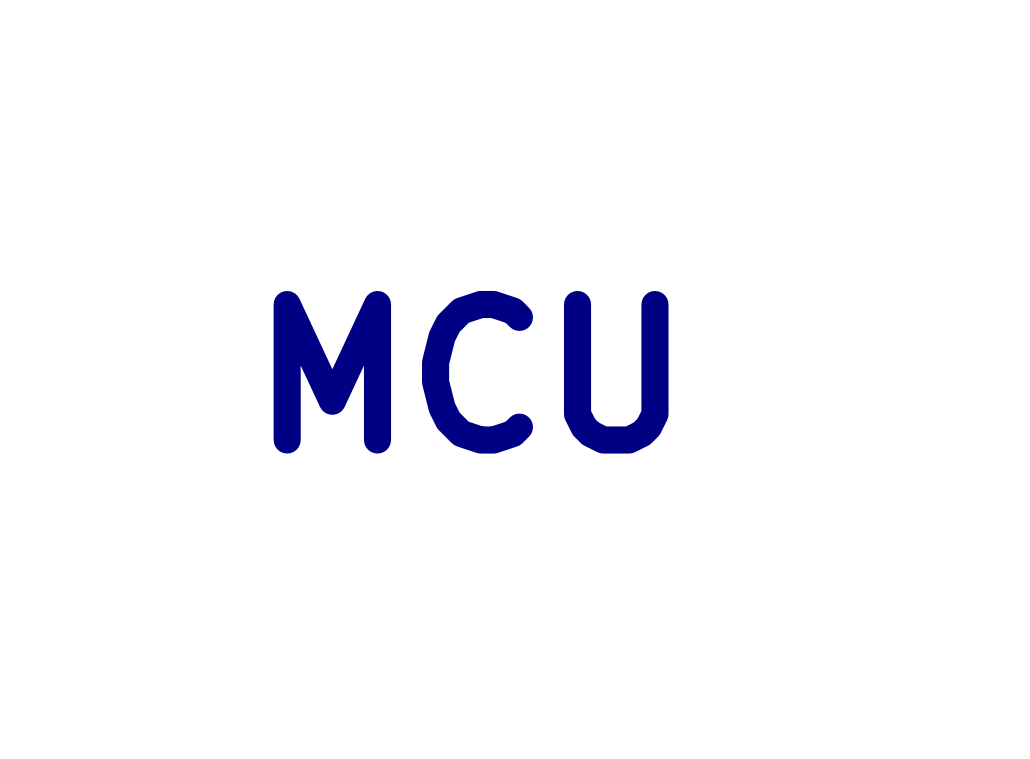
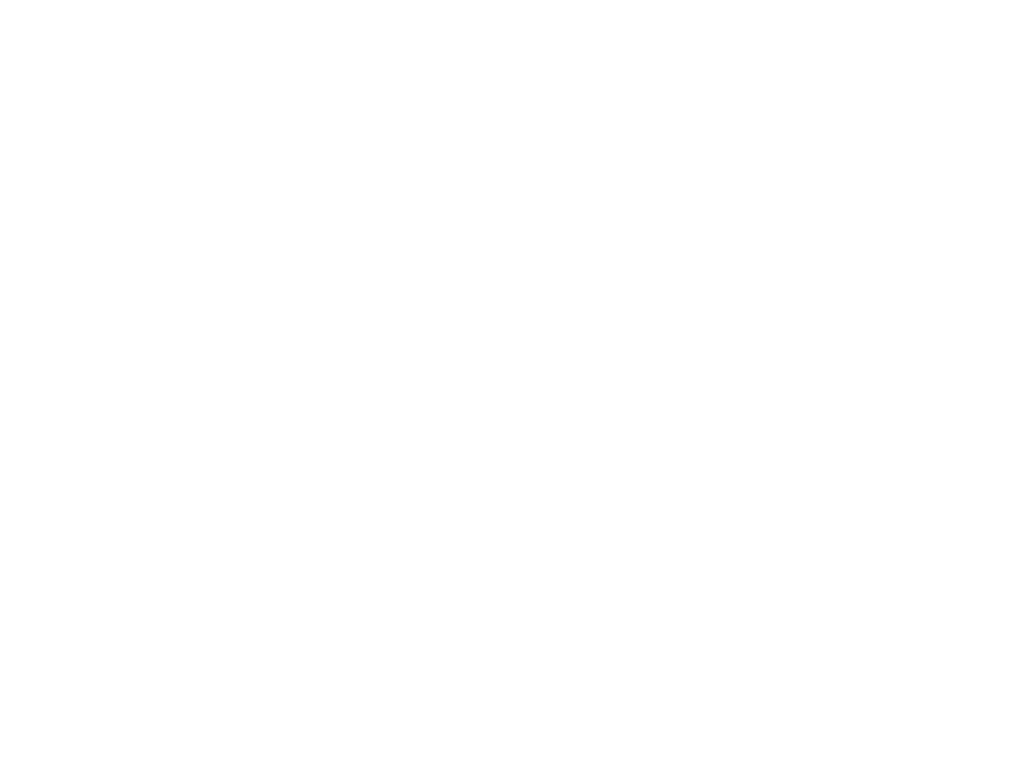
text: MCU (471, 372) -> none

